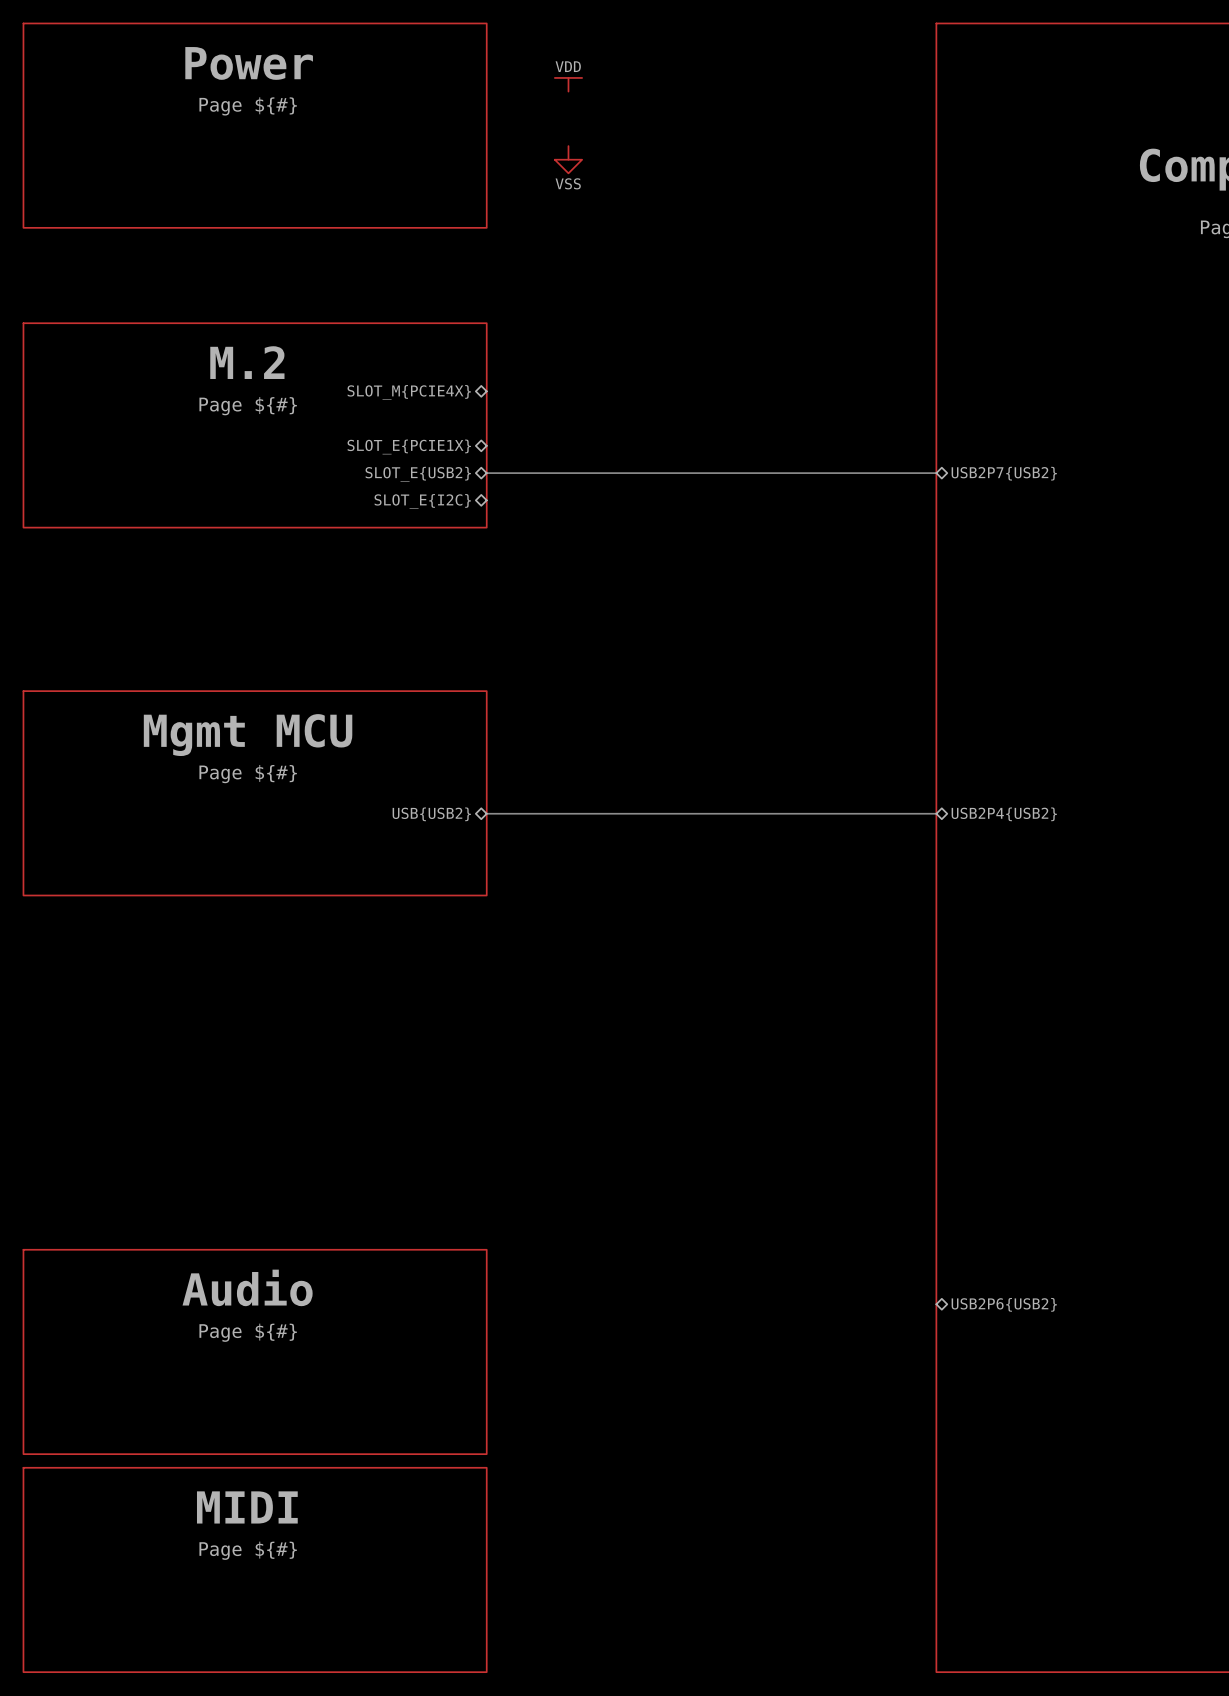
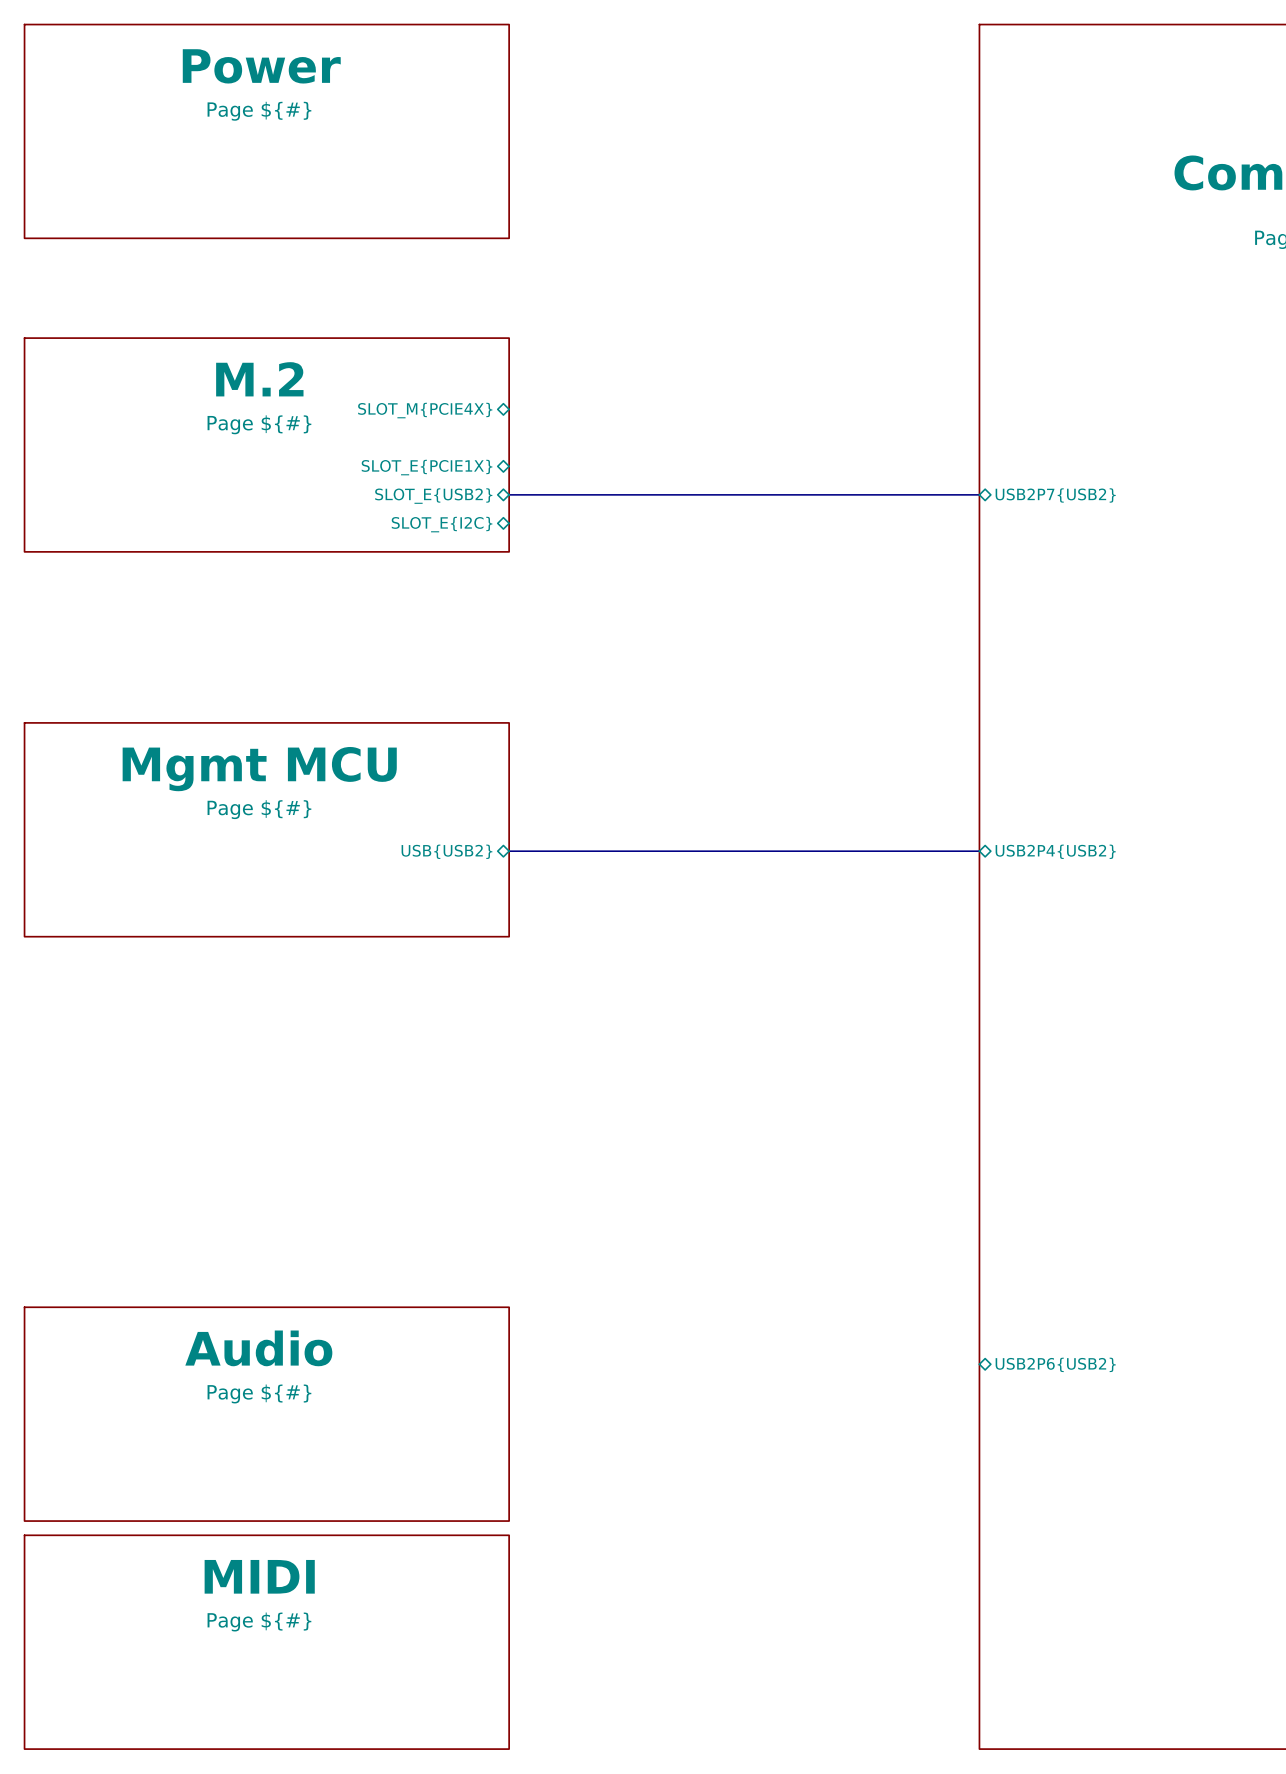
power symbol: VDD (568, 84) -> none
power symbol: VSS (568, 159) -> none

